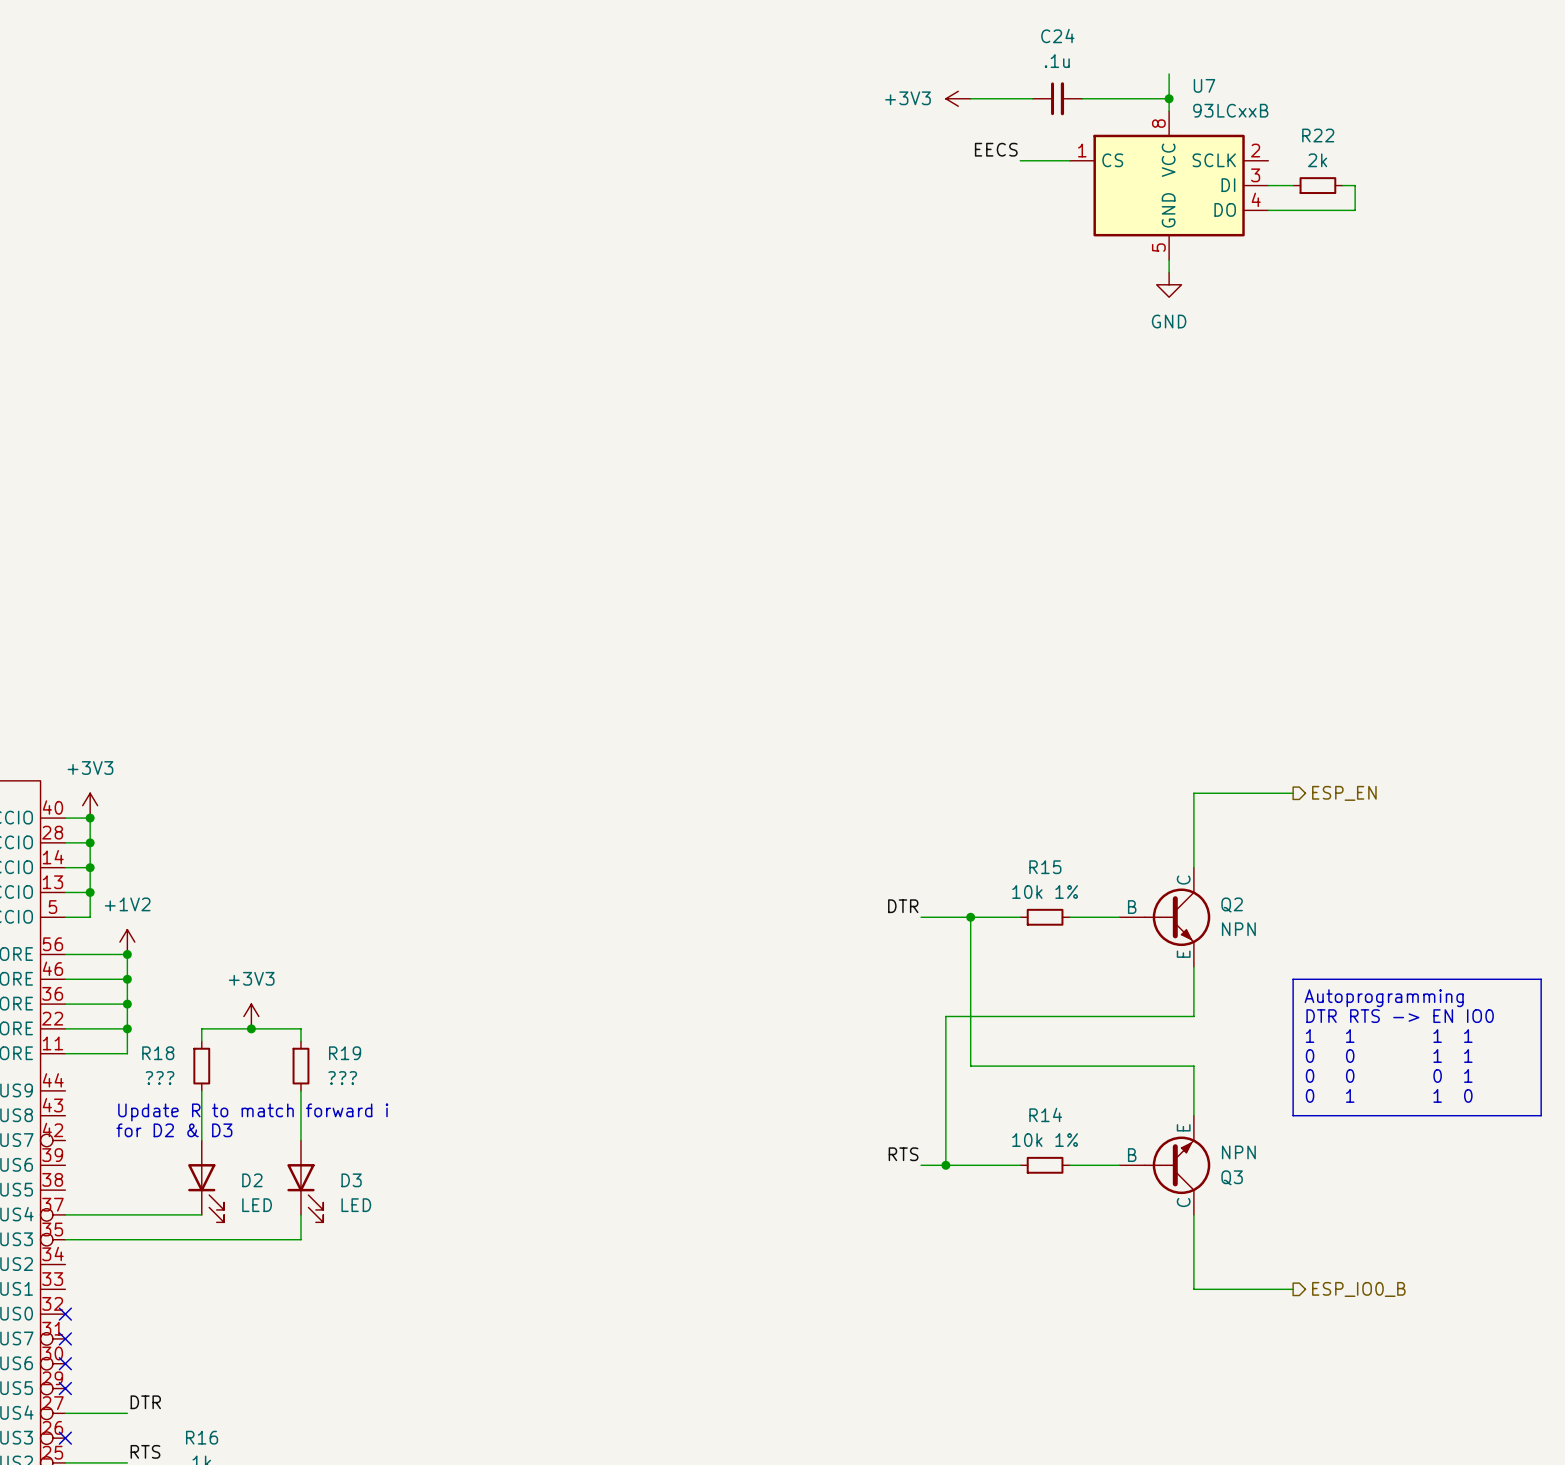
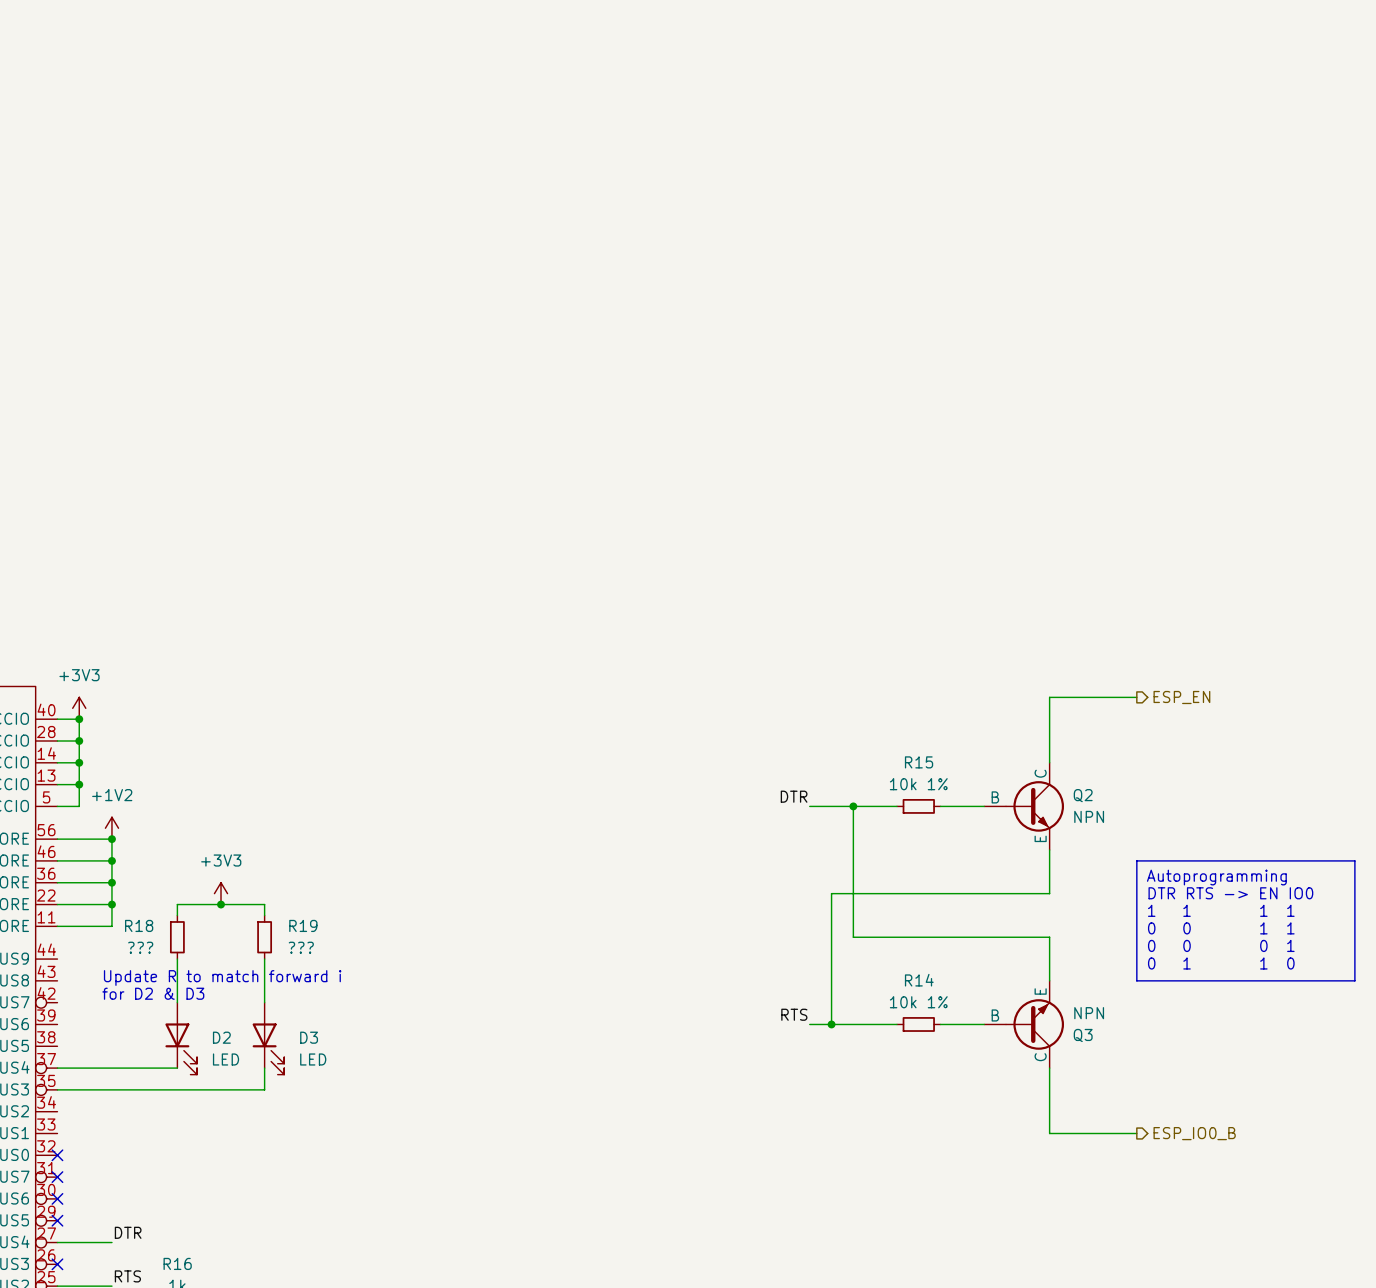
wire: (1169, 73) (1169, 111) -> none
power symbol: +3V3 (958, 98) -> none
wire: (970, 98) (1032, 98) -> none
C24: .1u (1057, 98) -> none
wire: (1082, 98) (1169, 98) -> none
junction: (1169, 98) -> none
label: EECS (996, 149) -> none
wire: (1020, 160) (1069, 160) -> none
U7: 93LCxxB (1169, 185) -> none
wire: (1268, 185) (1293, 185) -> none
R22: 2k (1317, 185) -> none
wire: (1342, 185) (1355, 185) (1355, 210) (1268, 210) -> none
wire: (1169, 259) (1169, 272) -> none
power symbol: GND (1169, 284) -> none

